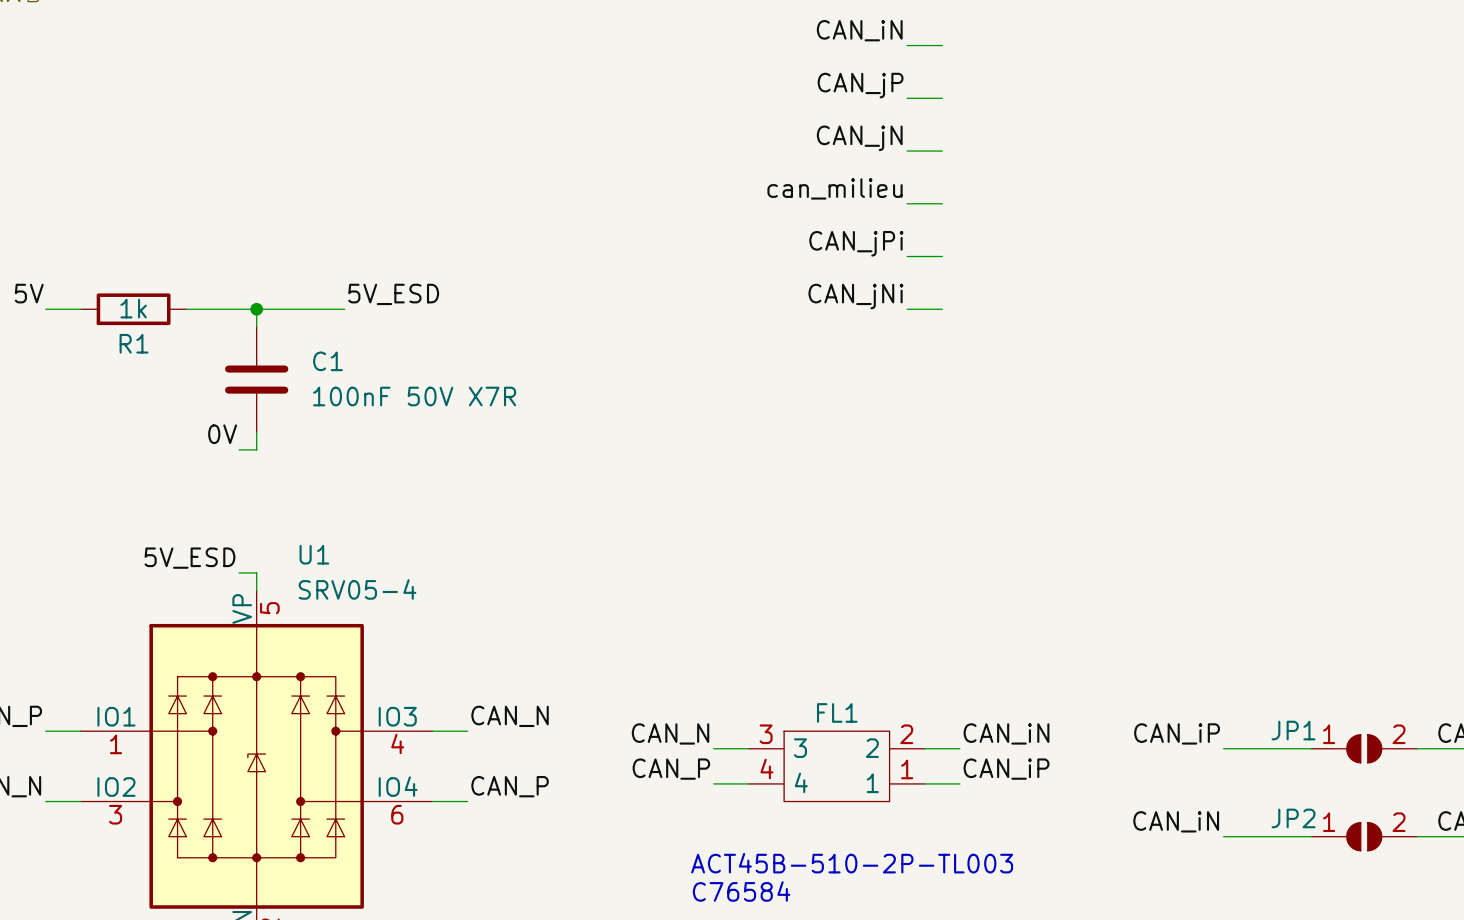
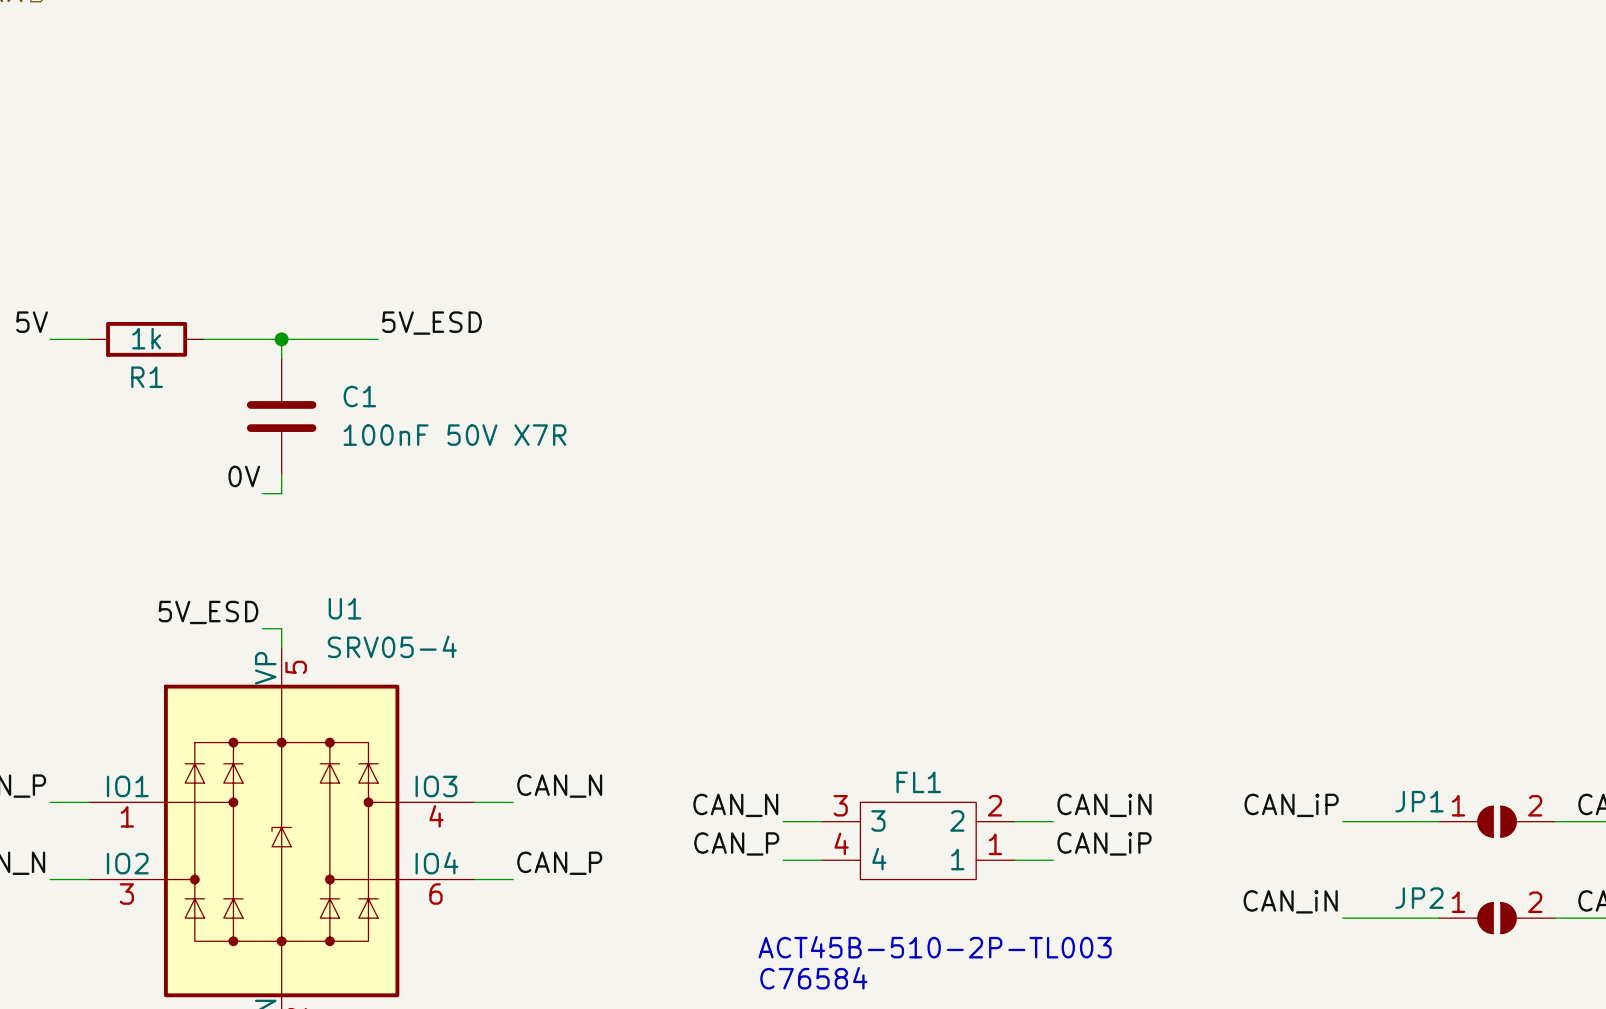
label: CAN_iN (859, 30) -> none
wire: (907, 45) (942, 45) -> none
label: CAN_jP (860, 85) -> none
wire: (907, 98) (942, 98) -> none
label: CAN_jN (859, 138) -> none
wire: (907, 151) (942, 151) -> none
label: can_milieu (835, 188) -> none
wire: (907, 203) (942, 203) -> none
label: CAN_jPi (856, 243) -> none
wire: (907, 256) (942, 256) -> none
label: CAN_jNi (855, 296) -> none
wire: (907, 309) (942, 309) -> none

